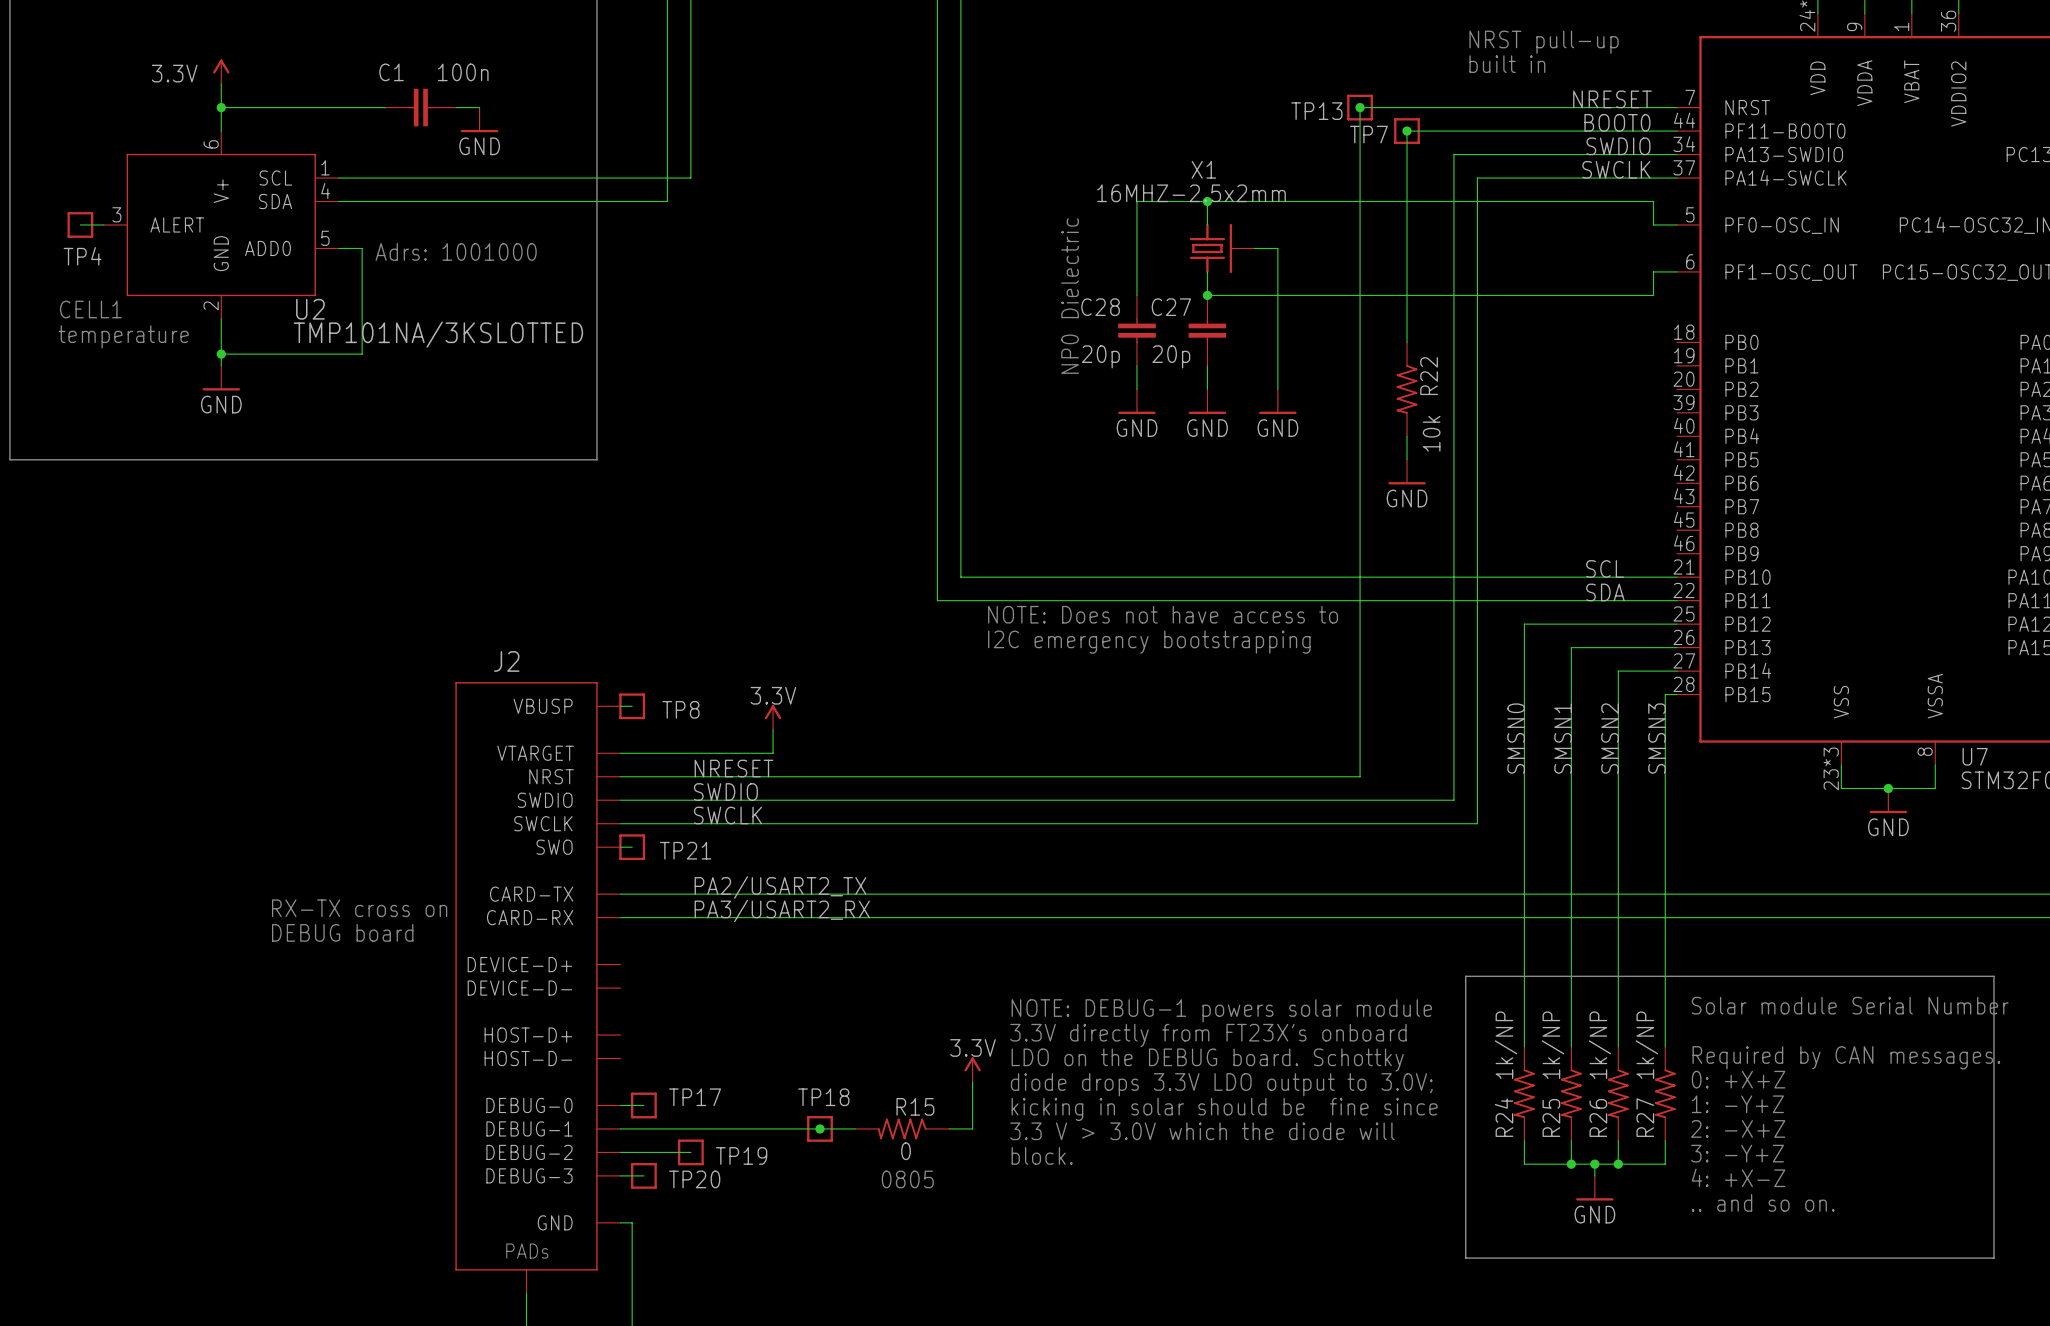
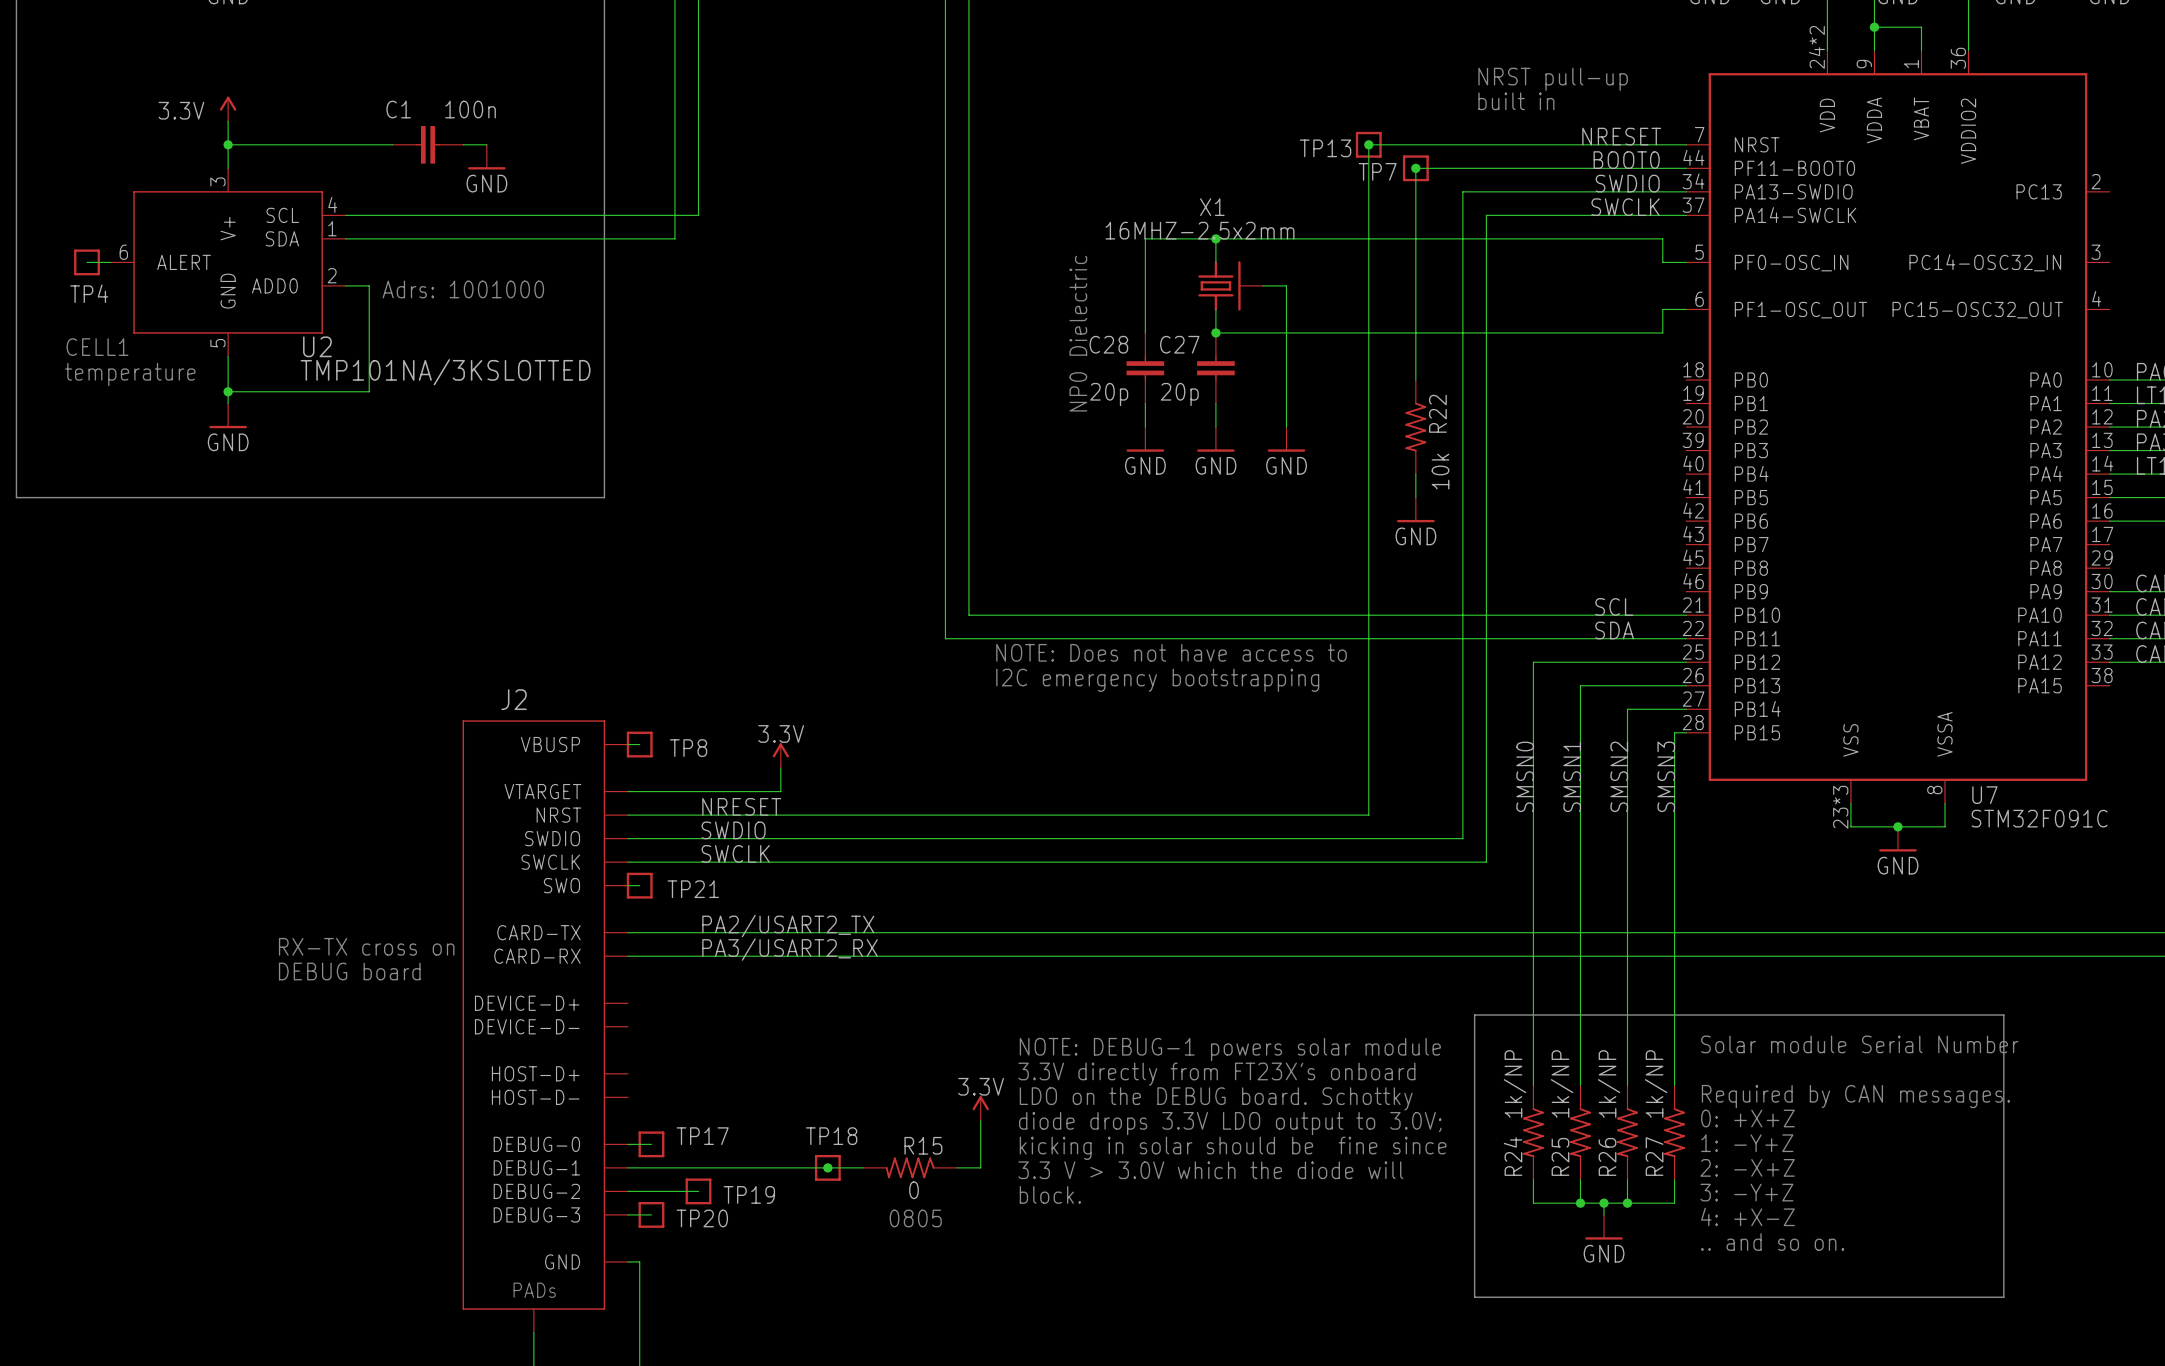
U2 pin number: 6 (211, 144) -> 3 (217, 181)
U2 pin number: 1 (325, 167) -> 4 (332, 204)
U2 pin number: 4 (325, 191) -> 1 (332, 228)
U2 pin number: 3 (116, 214) -> 6 (123, 252)
U2 pin number: 5 (325, 238) -> 2 (332, 275)
U2 pin number: 2 (211, 305) -> 5 (217, 343)

